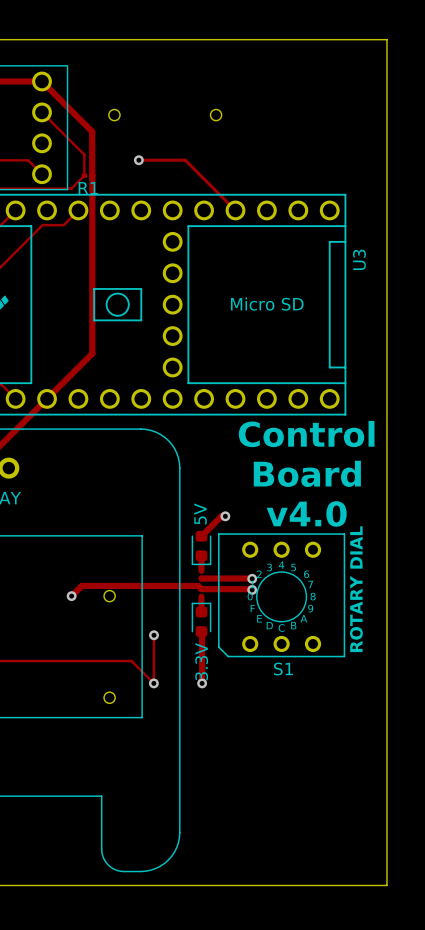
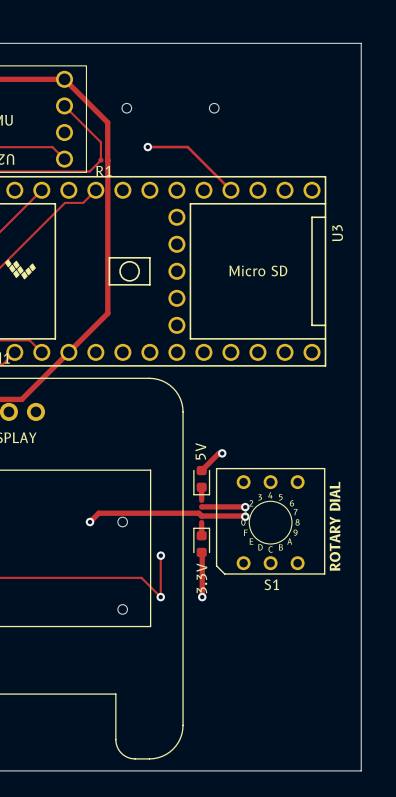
text: Control (306, 434) -> none
text: Board (307, 473) -> none
text: v4.0 (306, 513) -> none

